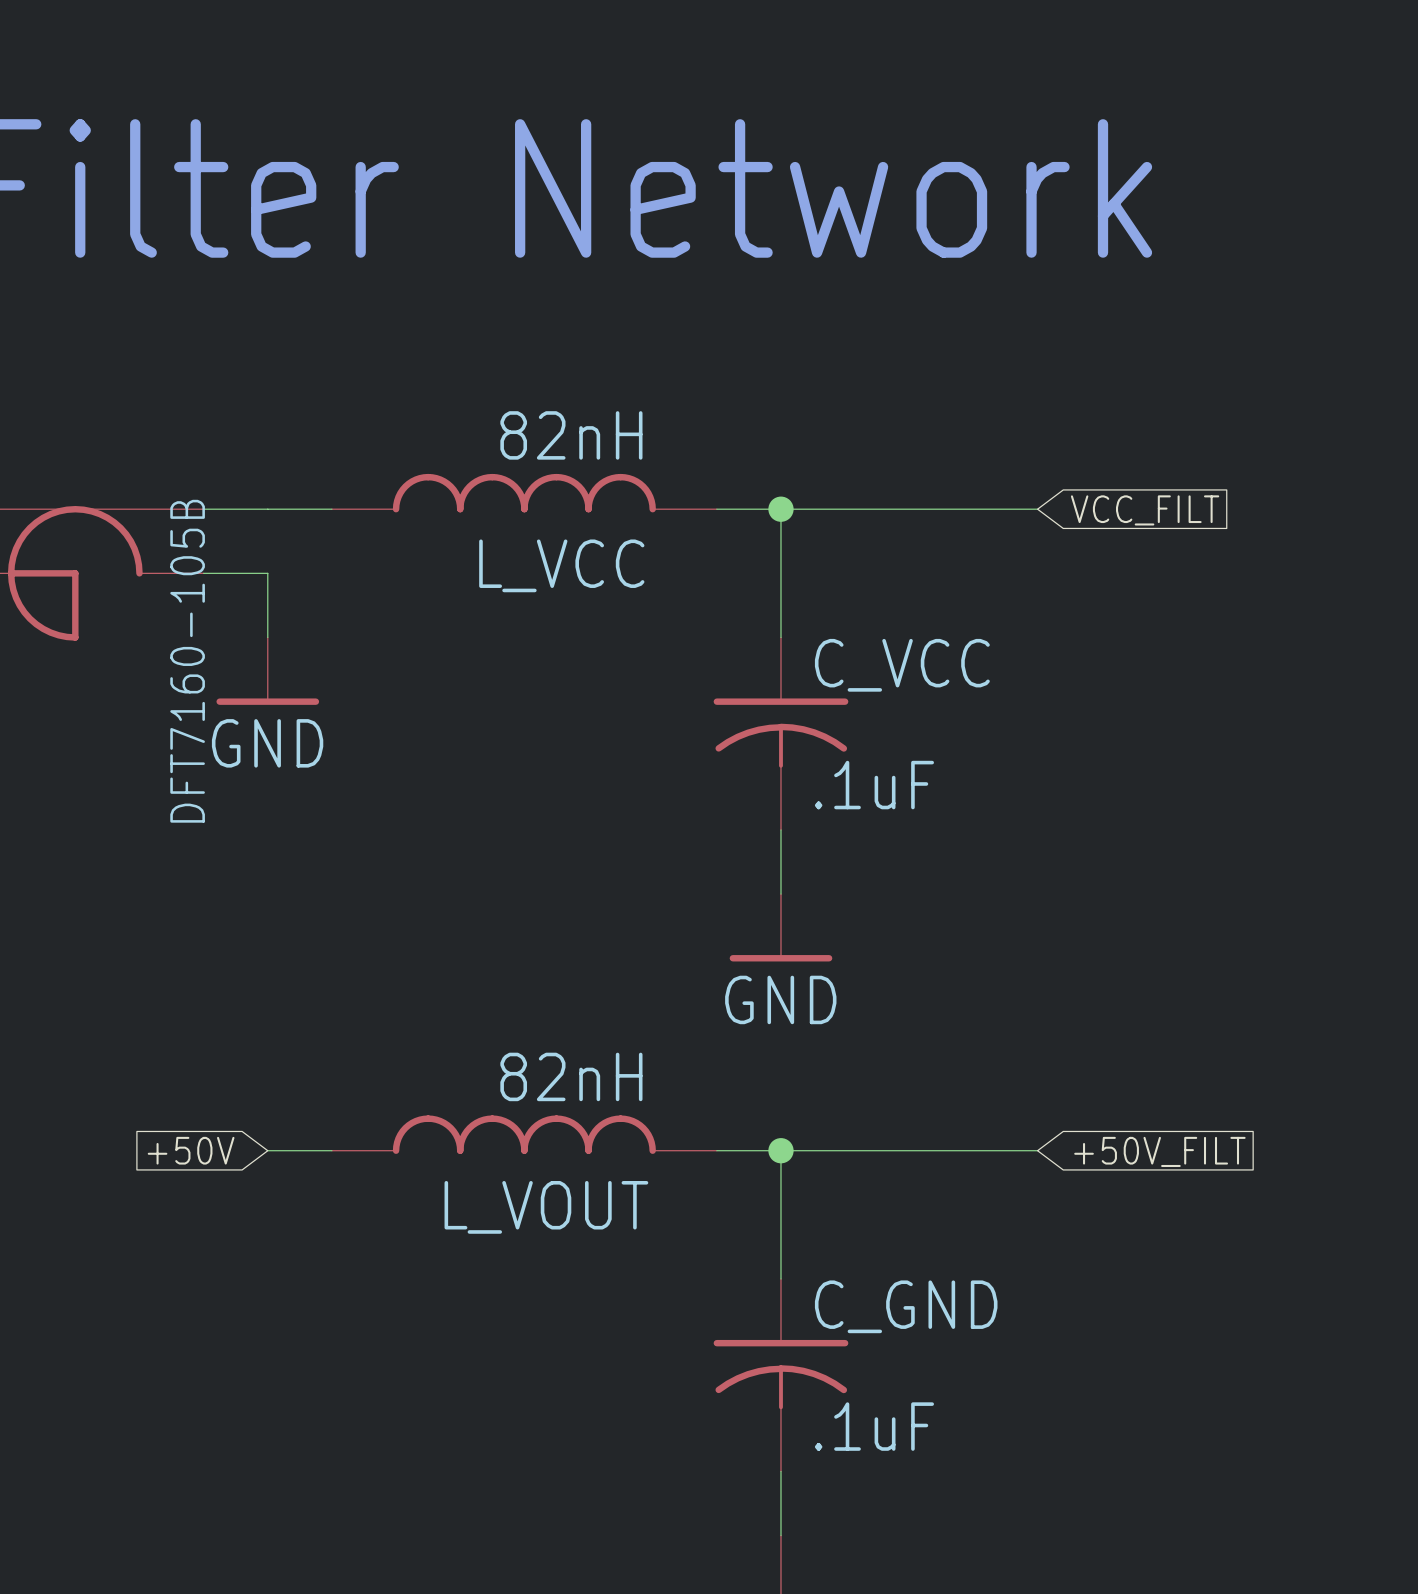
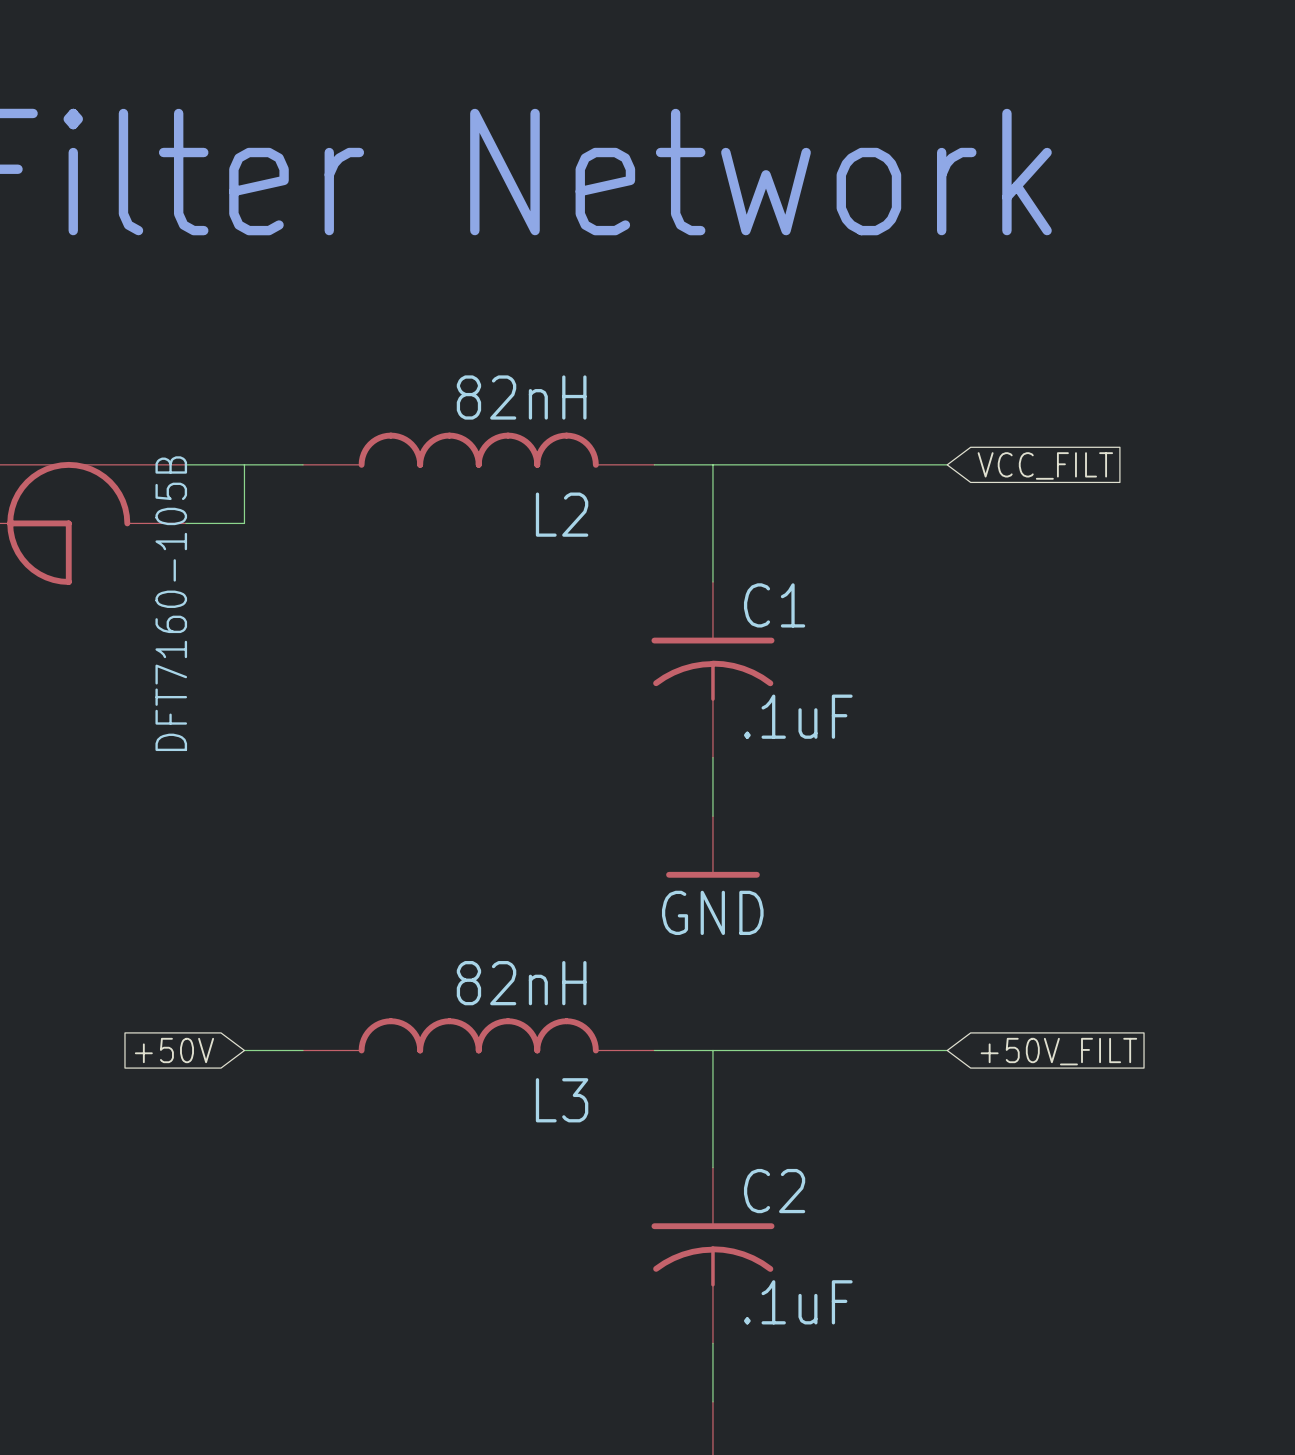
junction: (780, 509) -> none
L_VCC name: L_VCC (561, 565) -> L2 (562, 514)
wire: (267, 573) (267, 637) -> (244, 523) (244, 464)
C_VCC name: C_VCC (902, 665) -> C1 (774, 605)
power symbol: GND (267, 671) -> none
junction: (780, 1150) -> none
L_VOUT name: L_VOUT (546, 1207) -> L3 (562, 1100)
C_GND name: C_GND (906, 1306) -> C2 (774, 1191)

